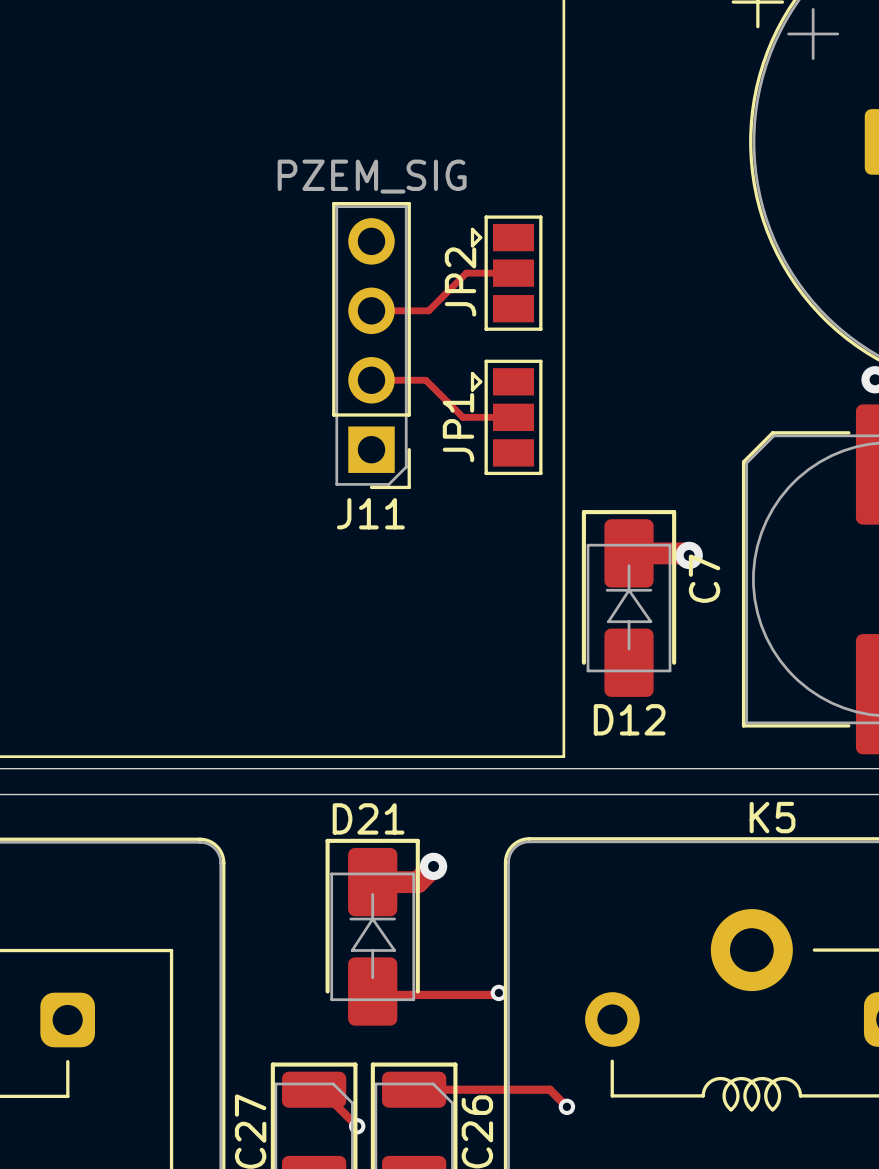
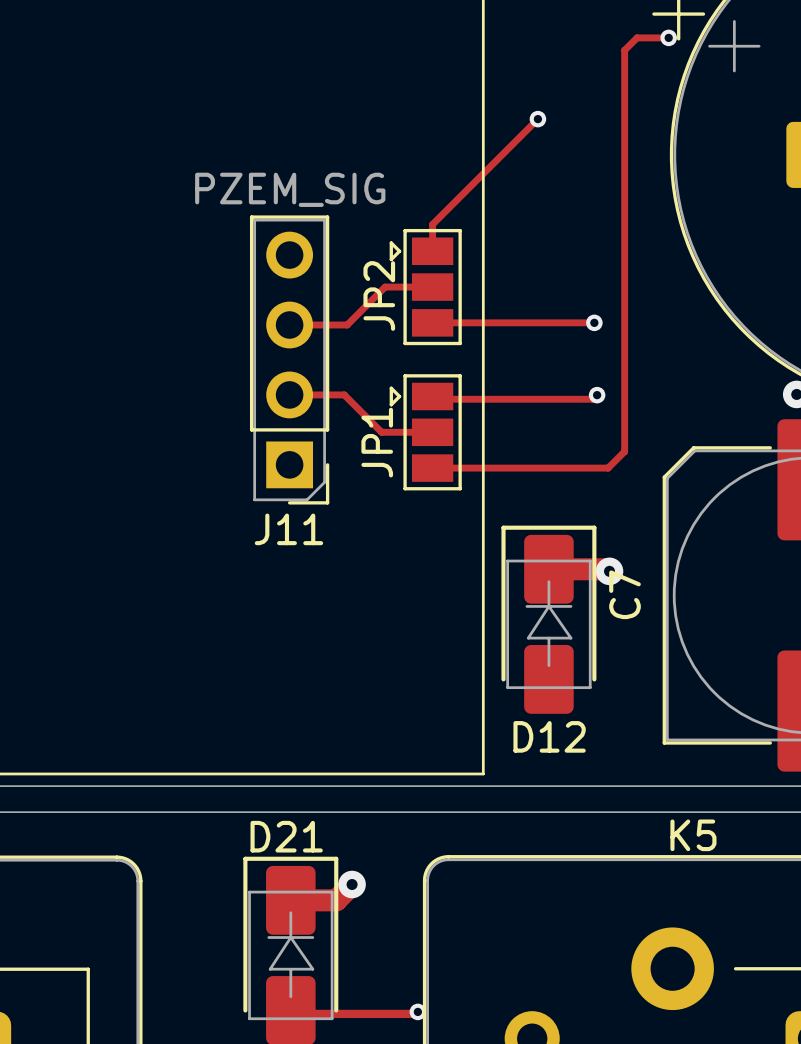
top track: none -> (668, 37) (637, 37) (624, 50) (624, 451) (608, 468) (432, 468)
via: none -> (668, 37)
top track: none -> (537, 119) (432, 224) (432, 251)
via: none -> (537, 119)
top track: none -> (432, 322) (594, 322)
via: none -> (594, 322)
top track: none -> (597, 395) (592, 399) (435, 399) (432, 396)
via: none -> (597, 395)

